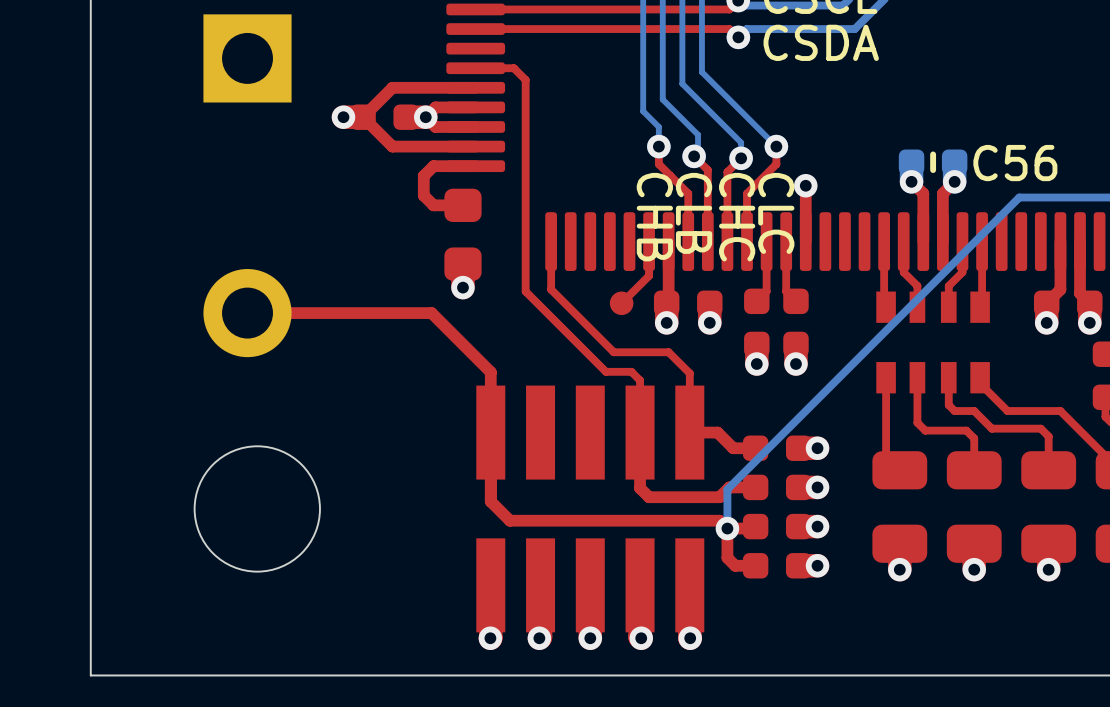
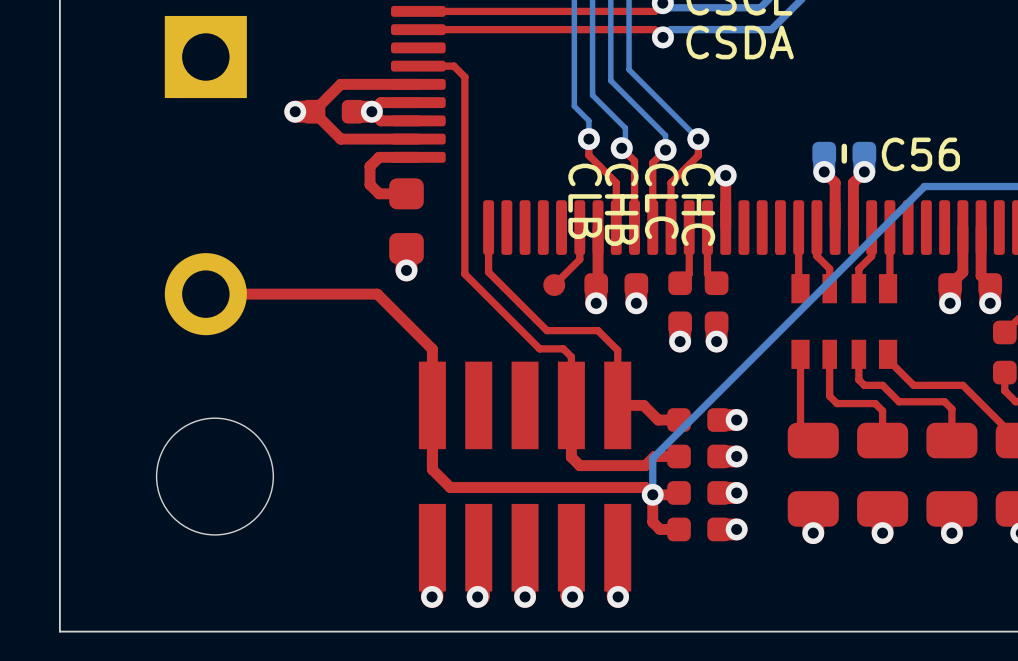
text position: CLB (694, 213) -> CLB (585, 201)
text position: CLC (776, 213) -> CLC (661, 201)
text position: CHB (654, 217) -> CHB (621, 204)
text position: CHC (737, 217) -> CHC (698, 204)

